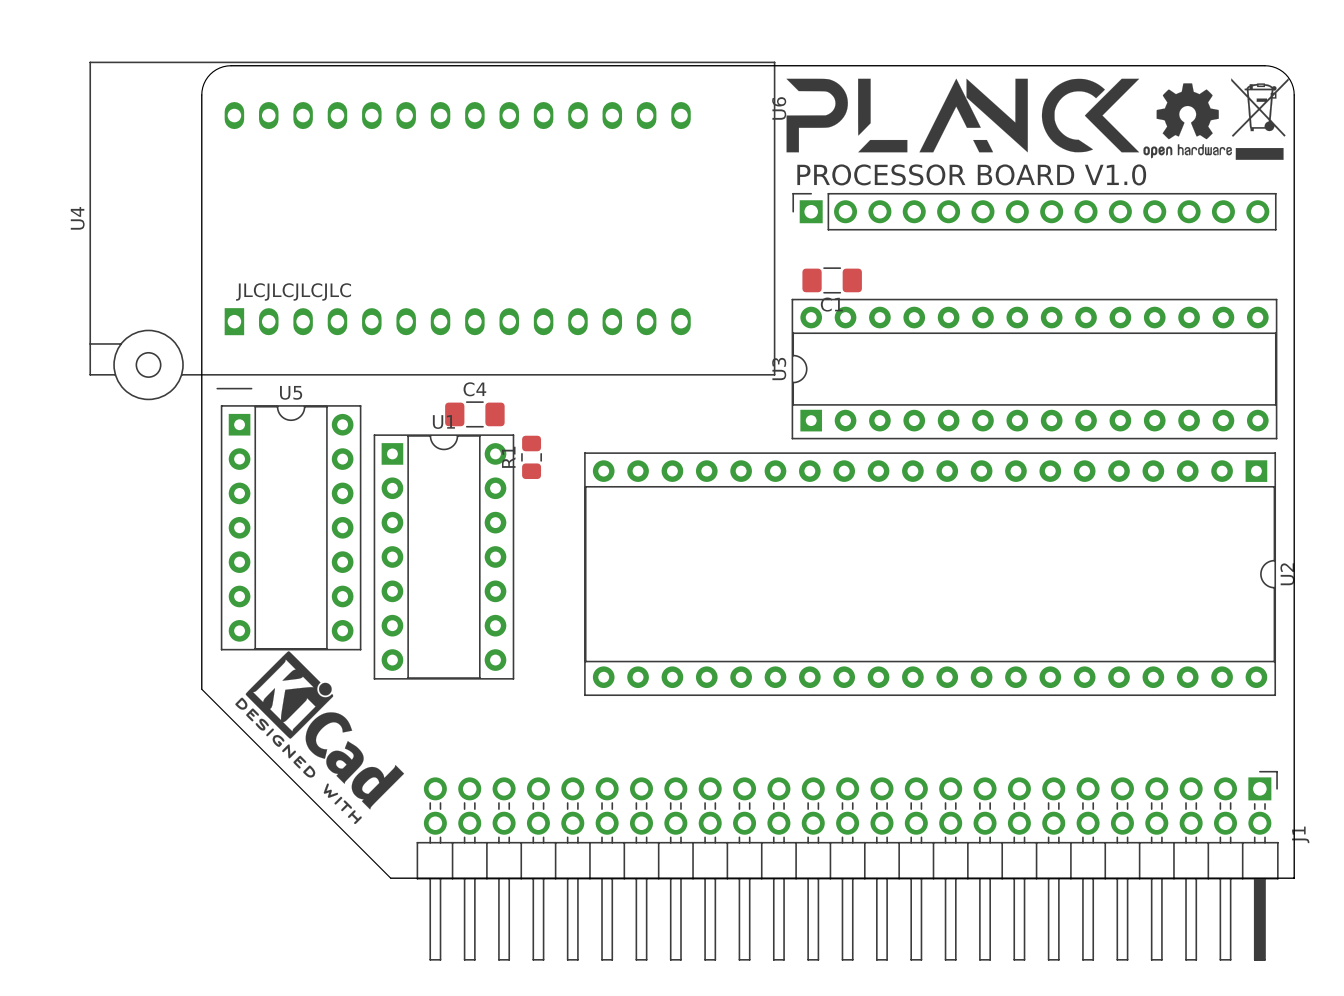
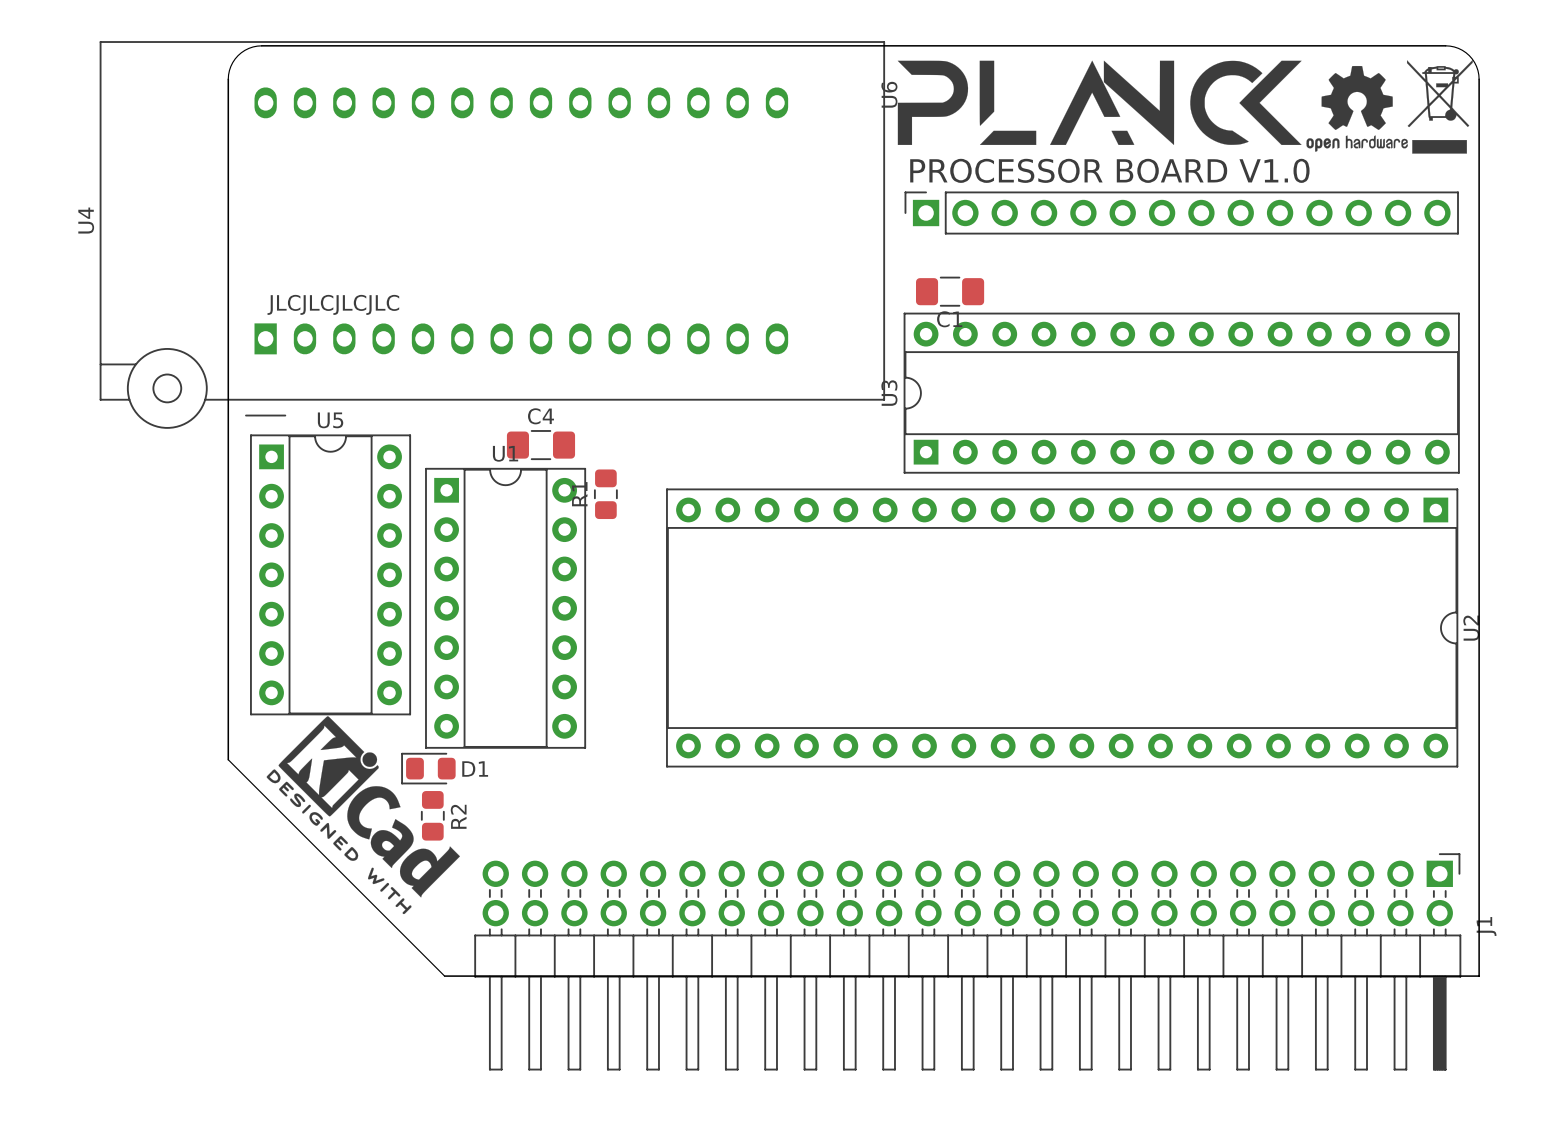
D1: none -> (428, 768)
R2: none -> (432, 815)

